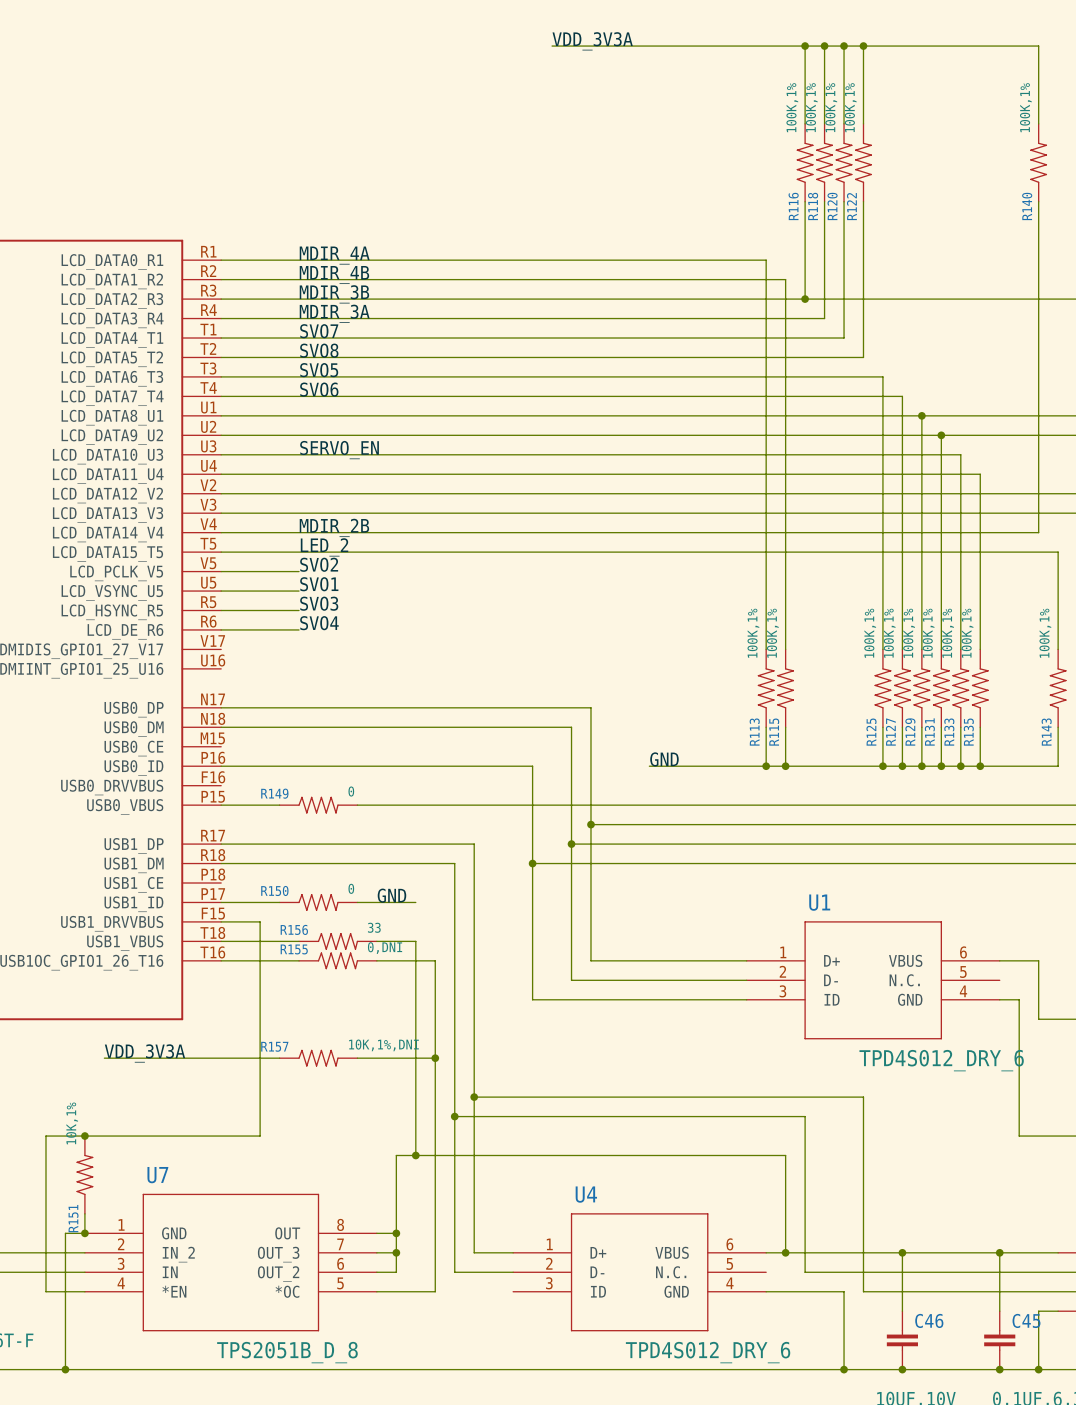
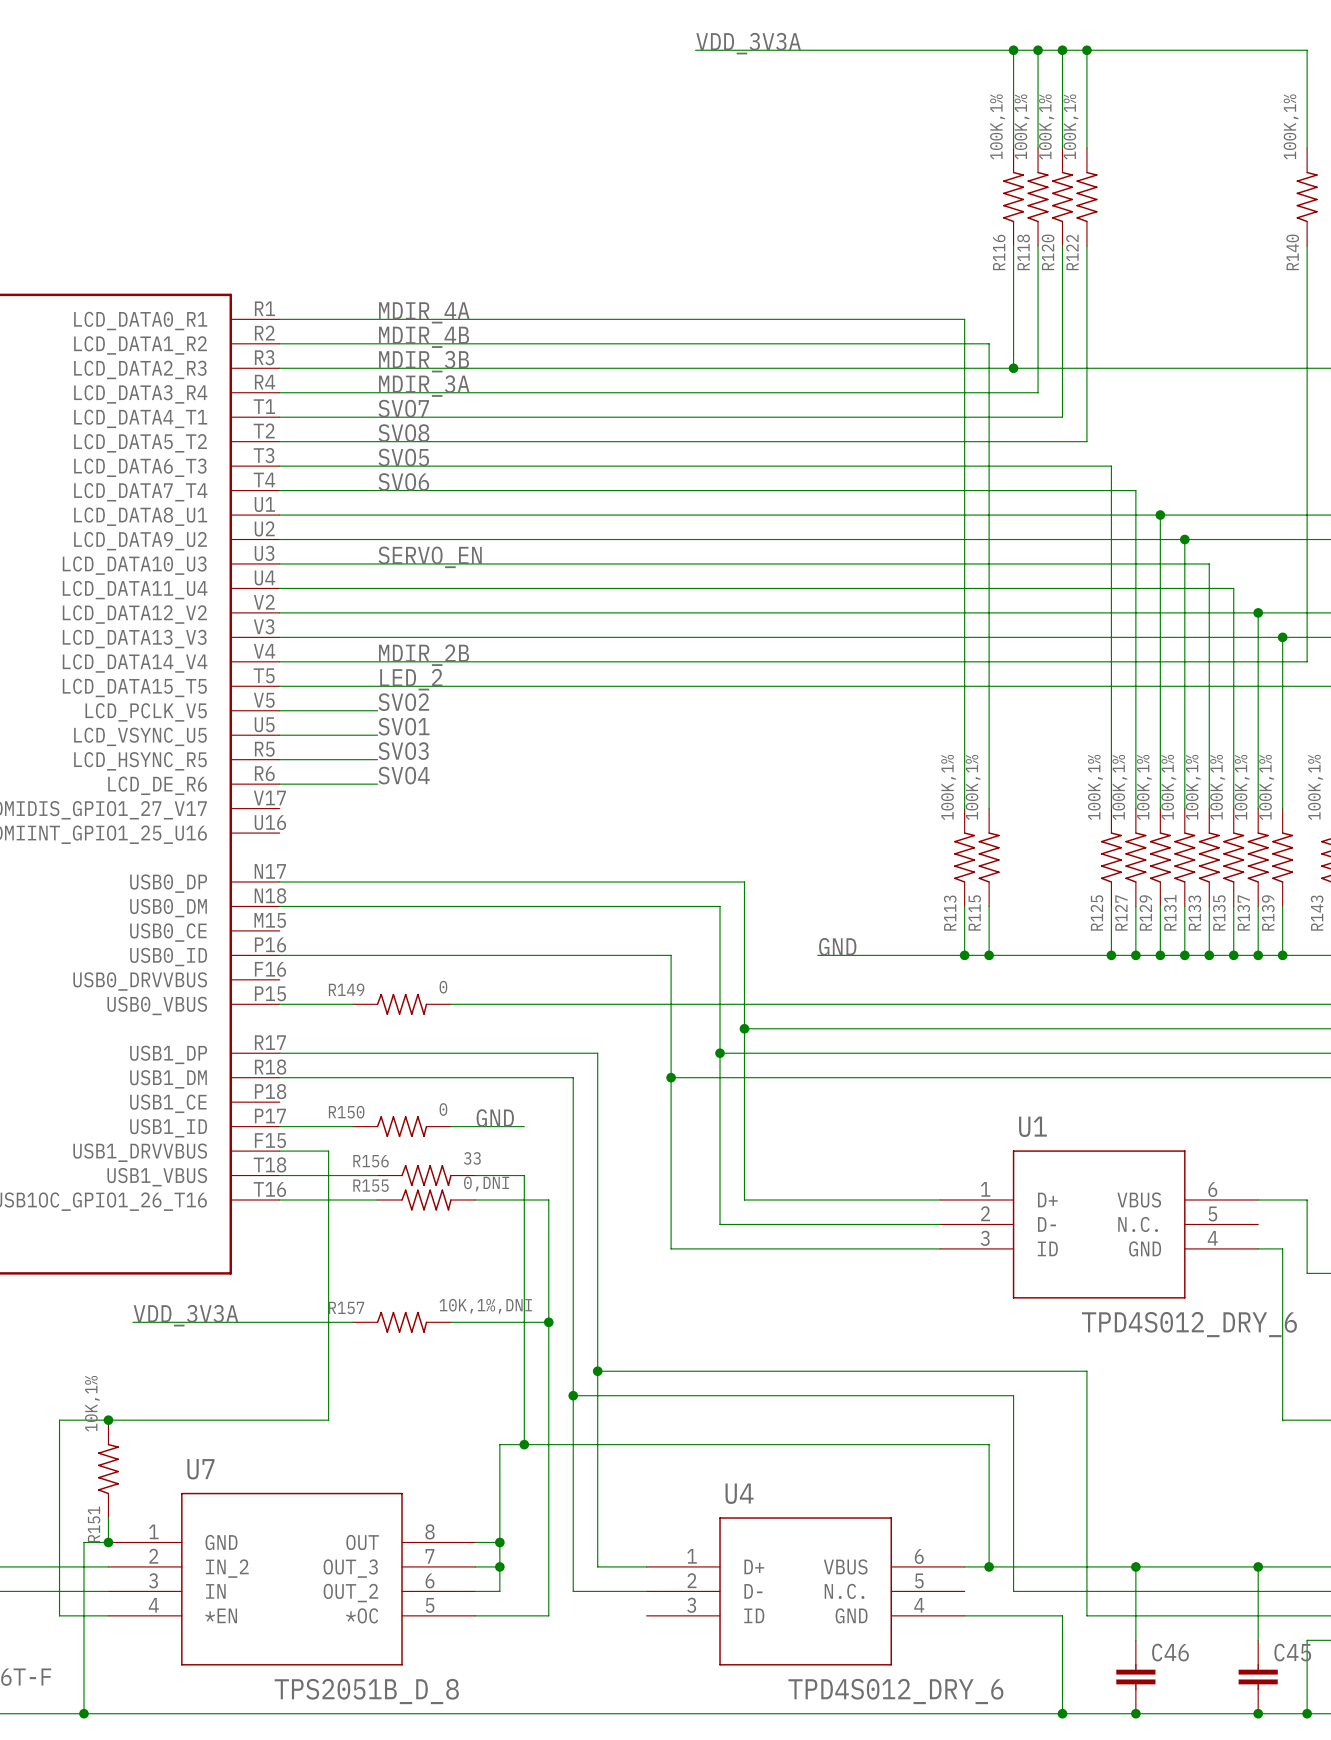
wire: none -> (1258, 612) (1258, 808)
junction: none -> (1258, 612)
wire: none -> (1282, 637) (1282, 808)
junction: none -> (1282, 637)
R137: none -> 100K,1% (1258, 857)
R139: none -> 100K,1% (1282, 857)
wire: none -> (1258, 906) (1258, 955)
wire: none -> (1282, 906) (1282, 955)
junction: none -> (1258, 955)
junction: none -> (1282, 955)

